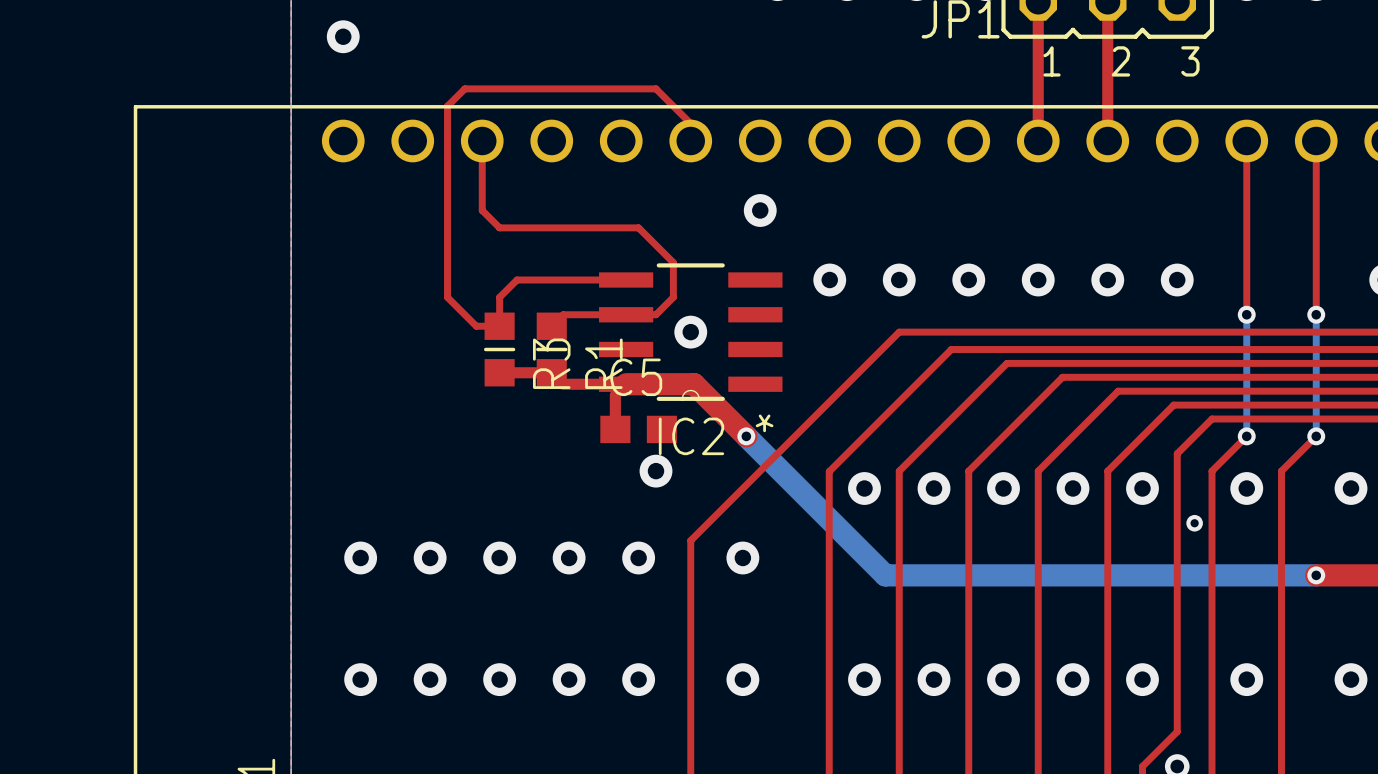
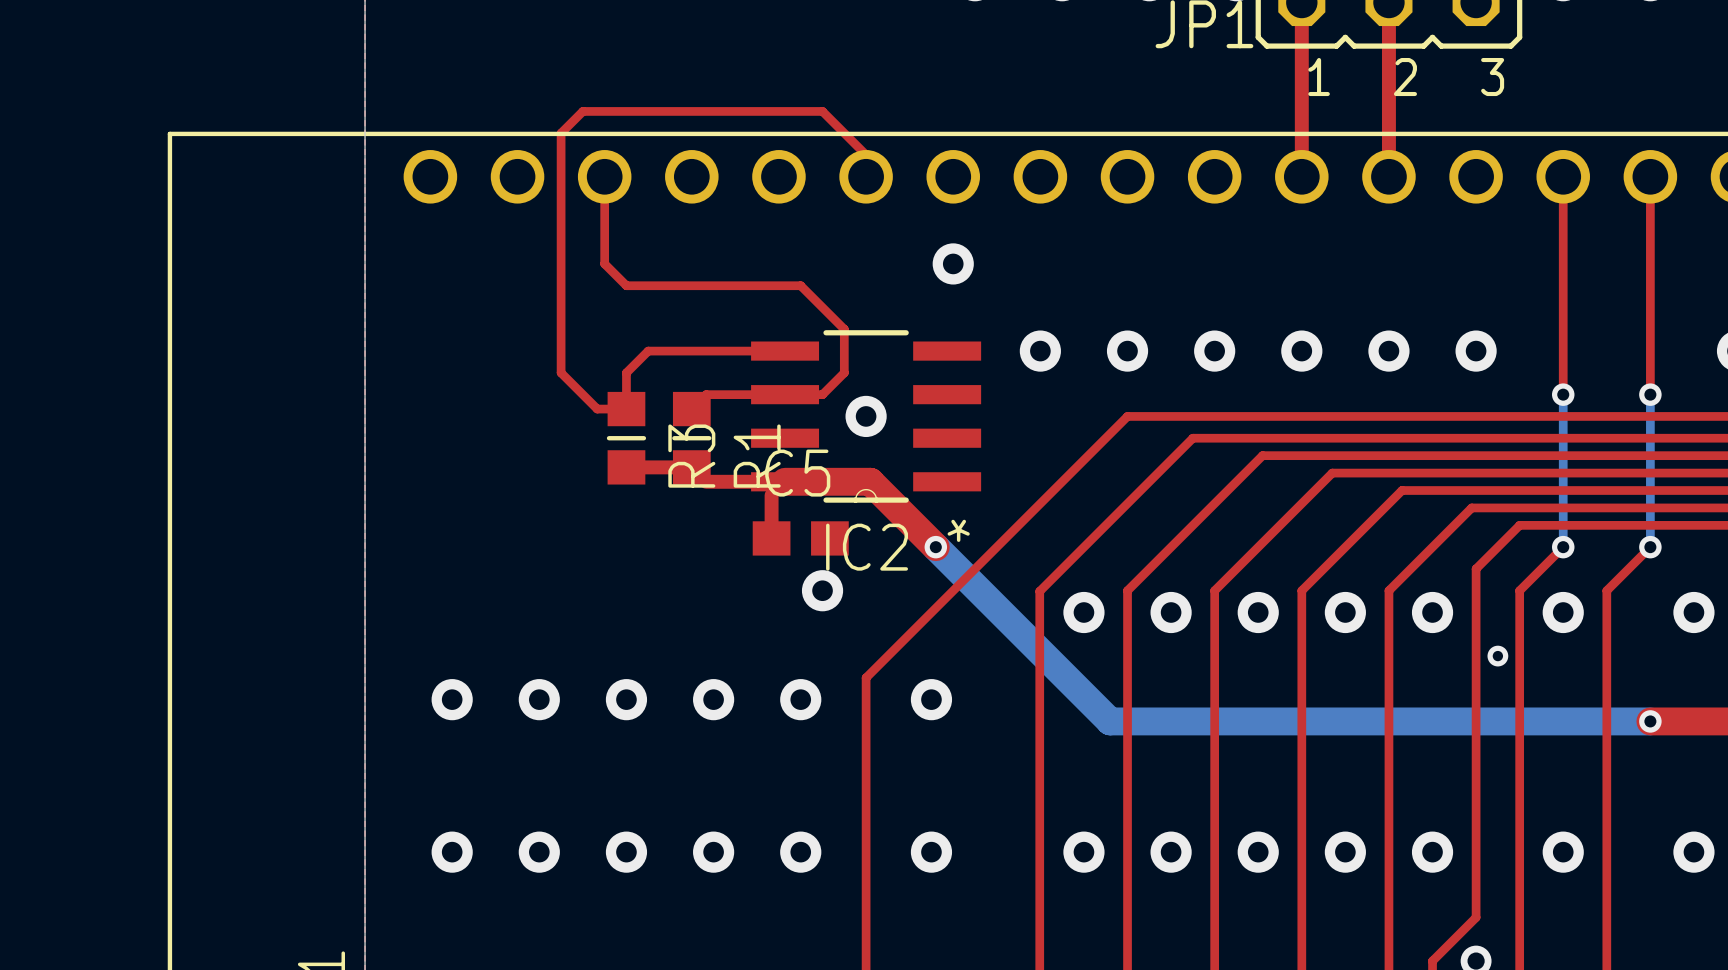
via: (343, 36) -> none

